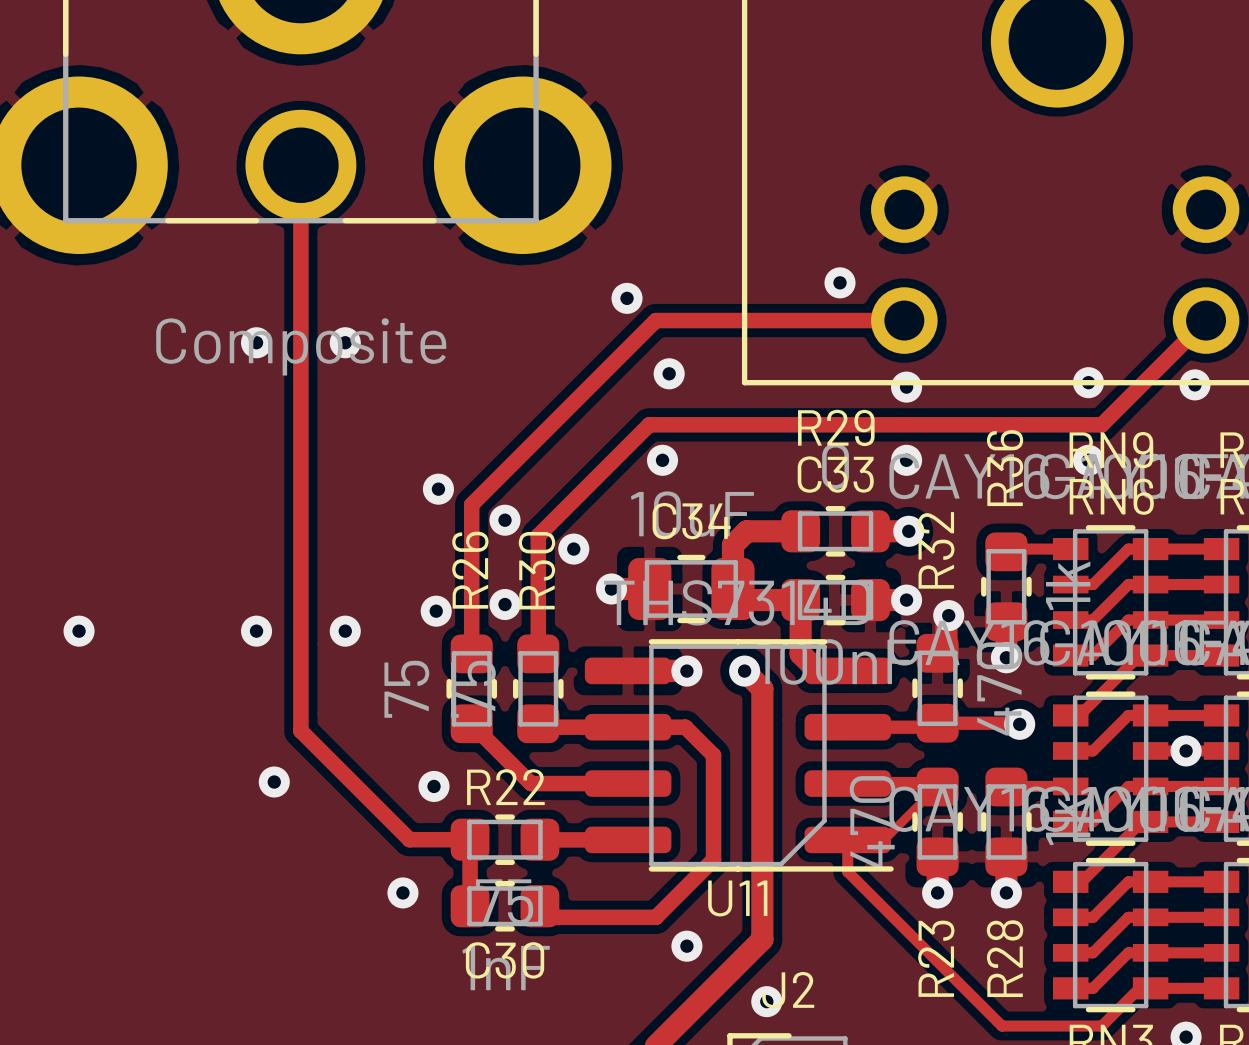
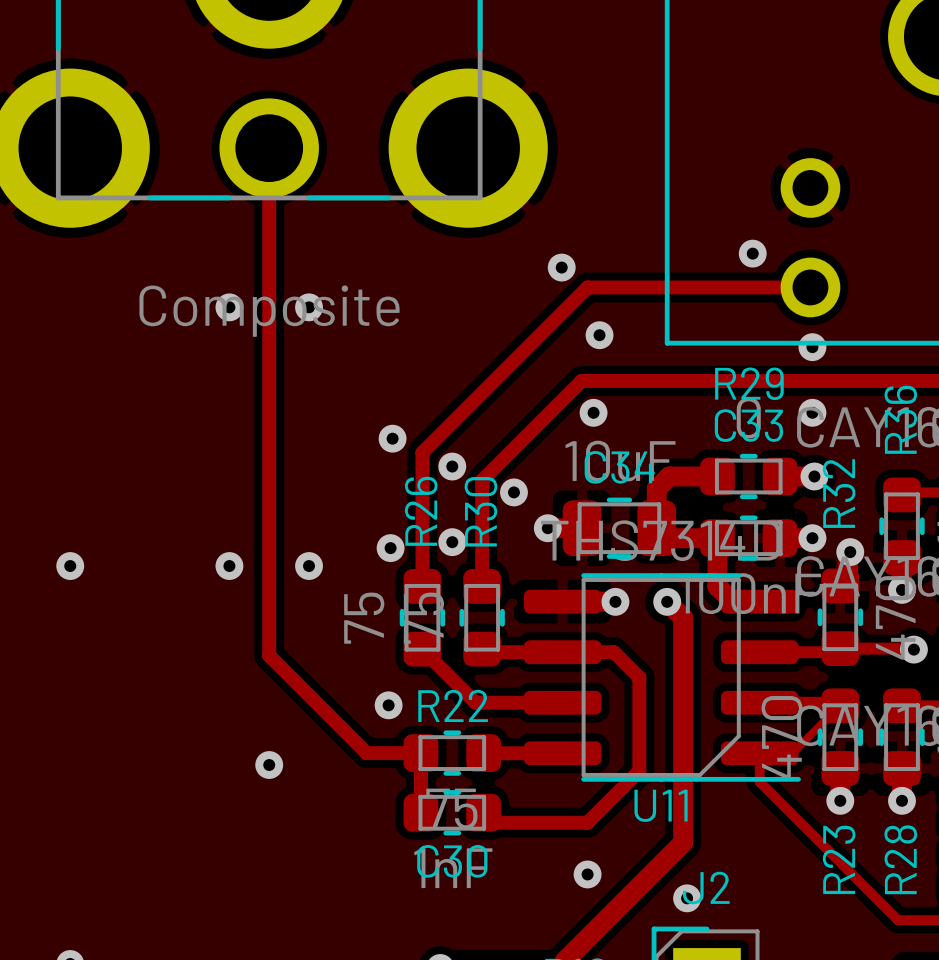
via: (274, 782) -> none
via: none -> (269, 765)
via: (402, 892) -> none
via position: (686, 946) -> (587, 874)

